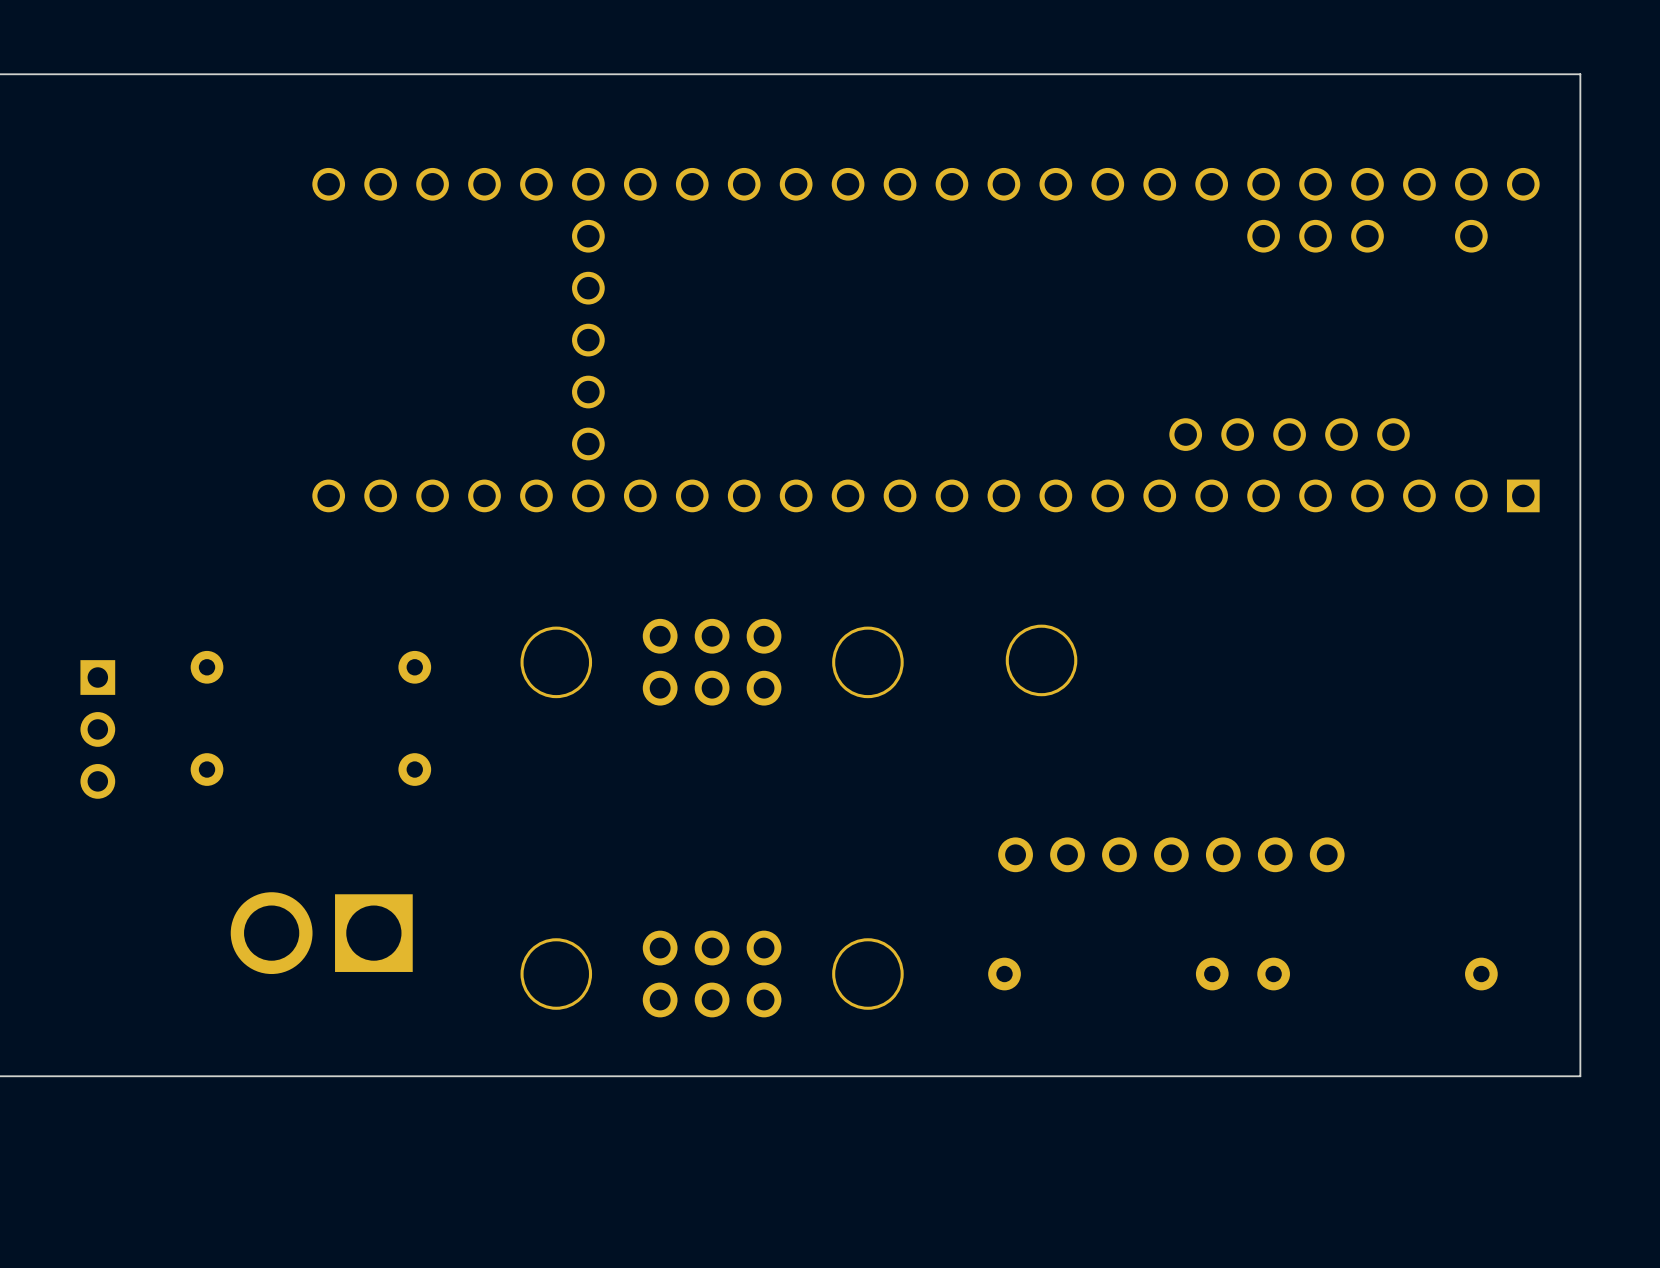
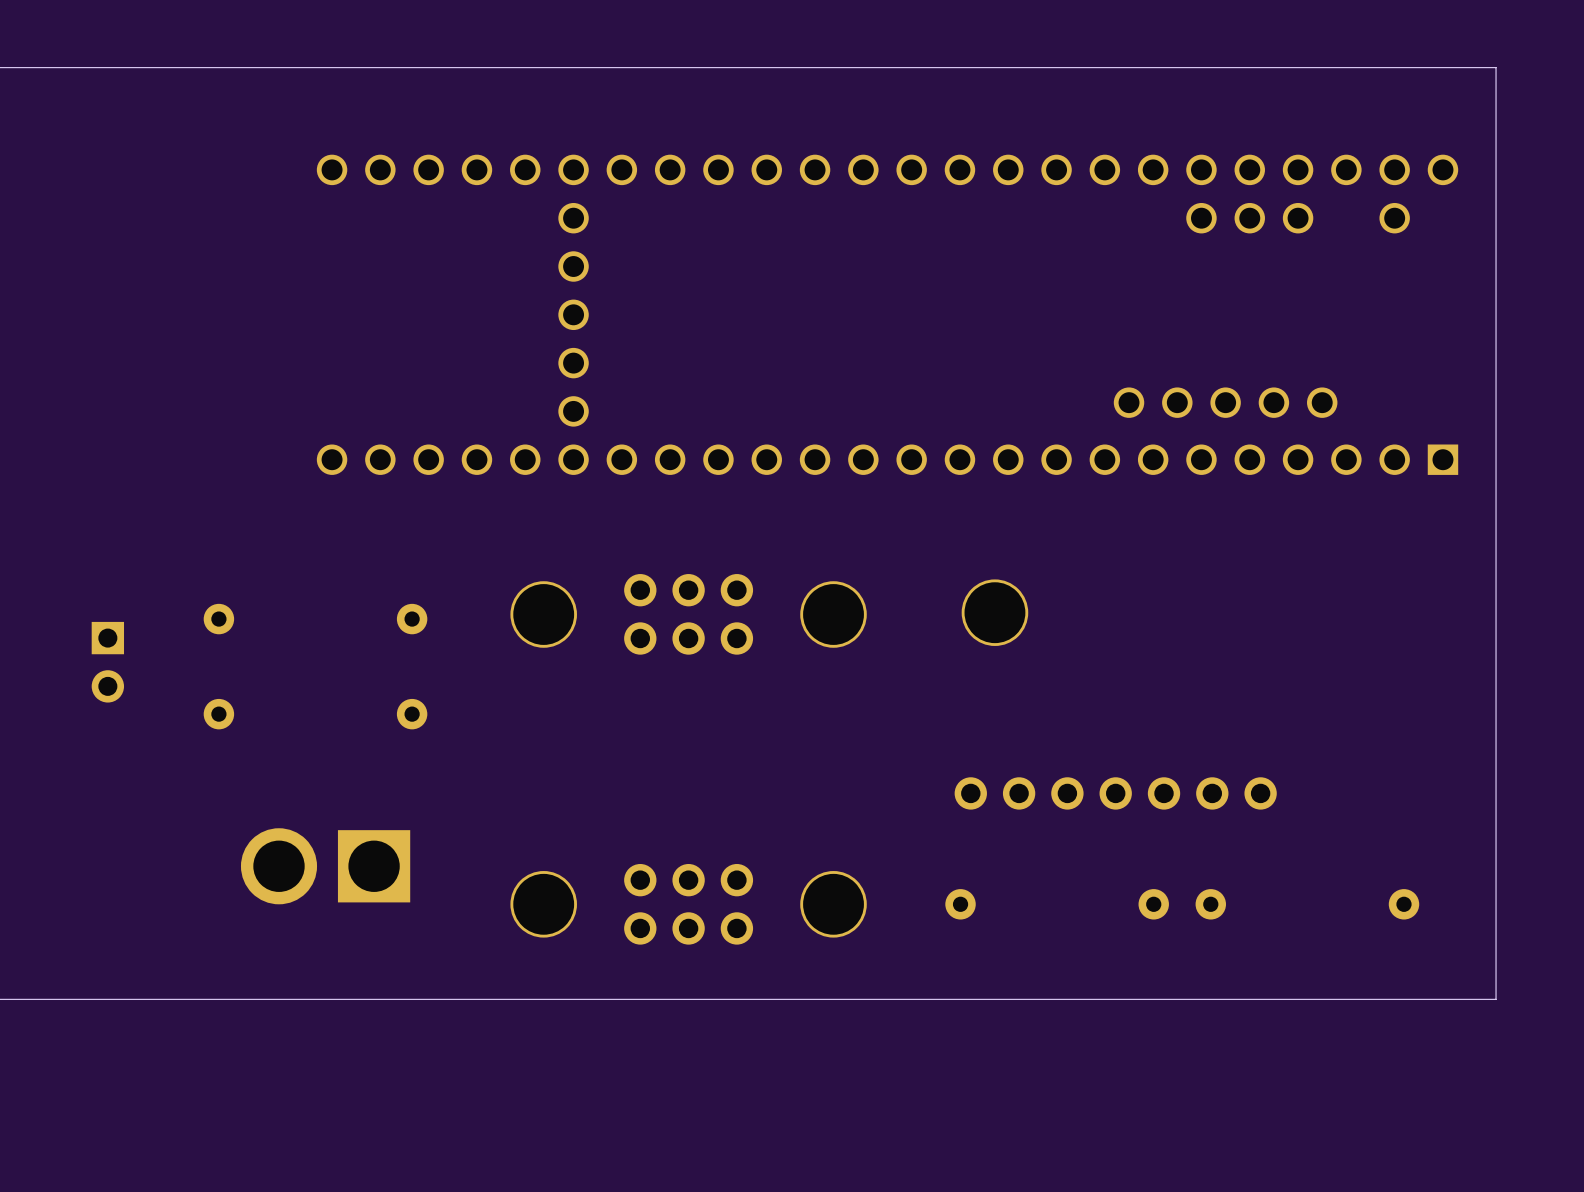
part footprint: [80, 660, 116, 799] -> [91, 621, 125, 703]

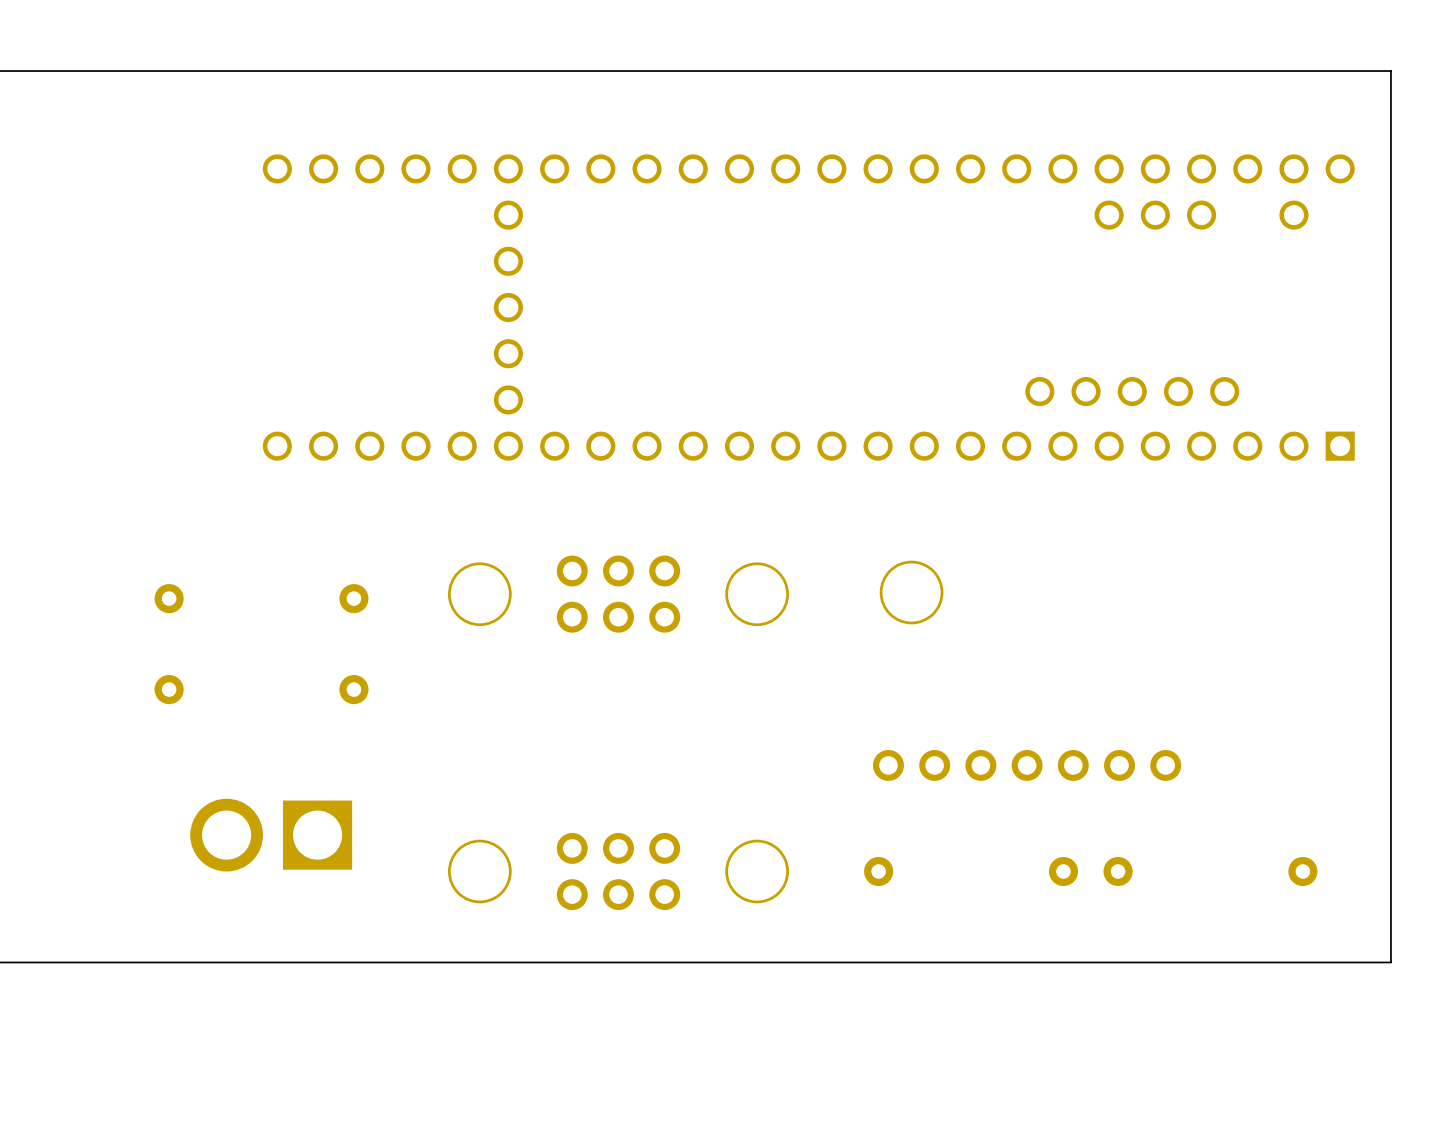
part: (107, 662) -> none

